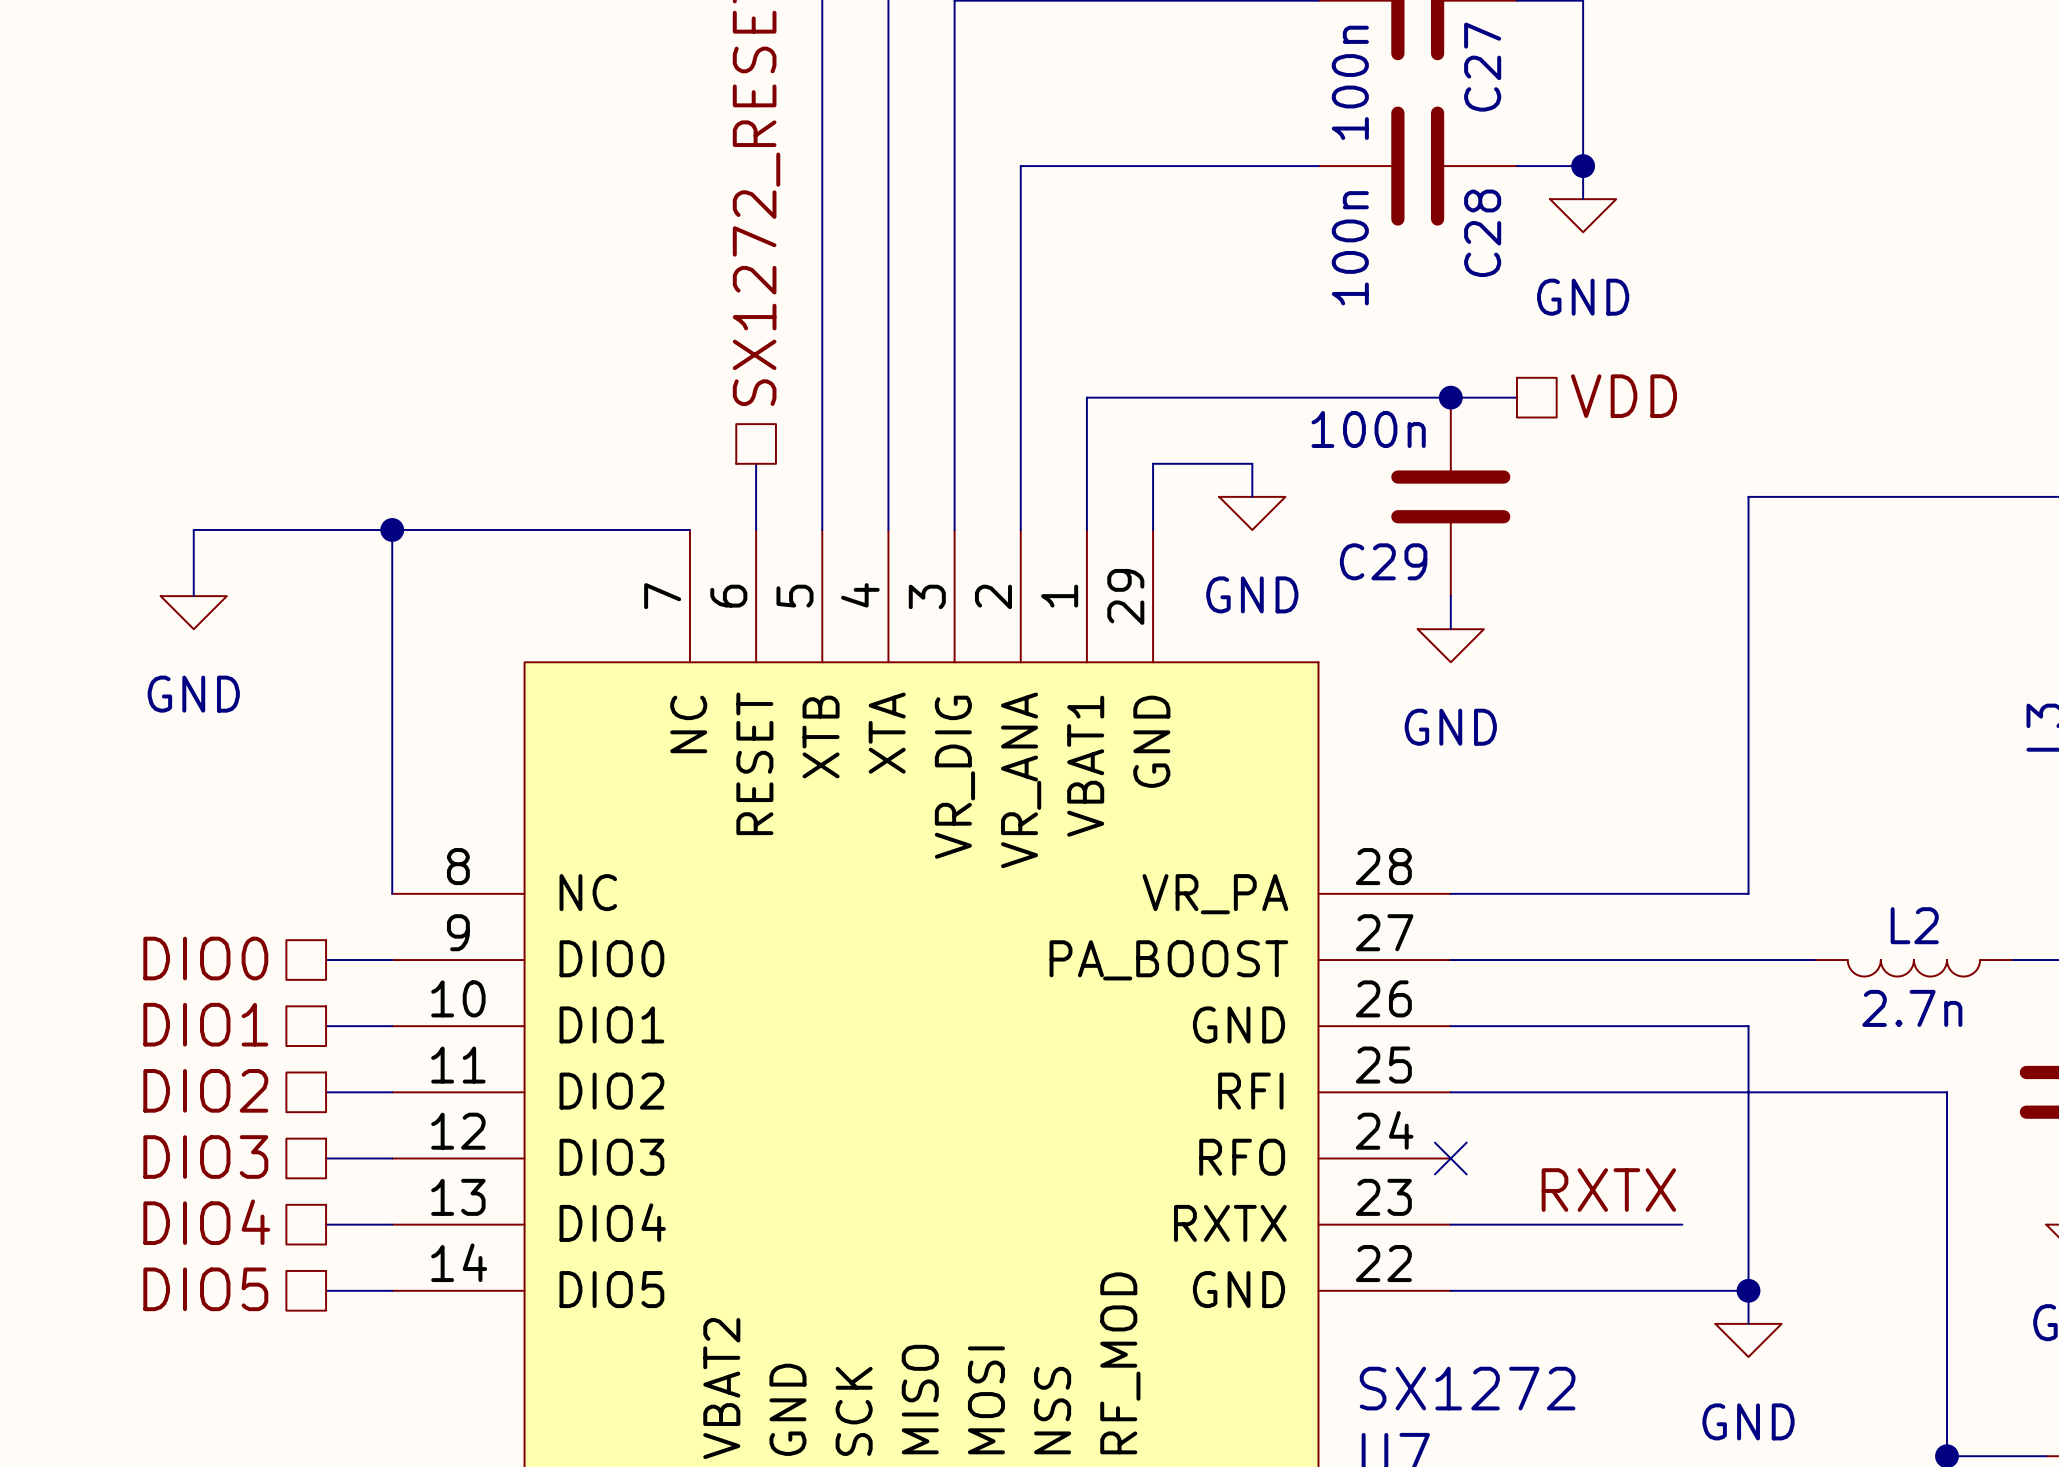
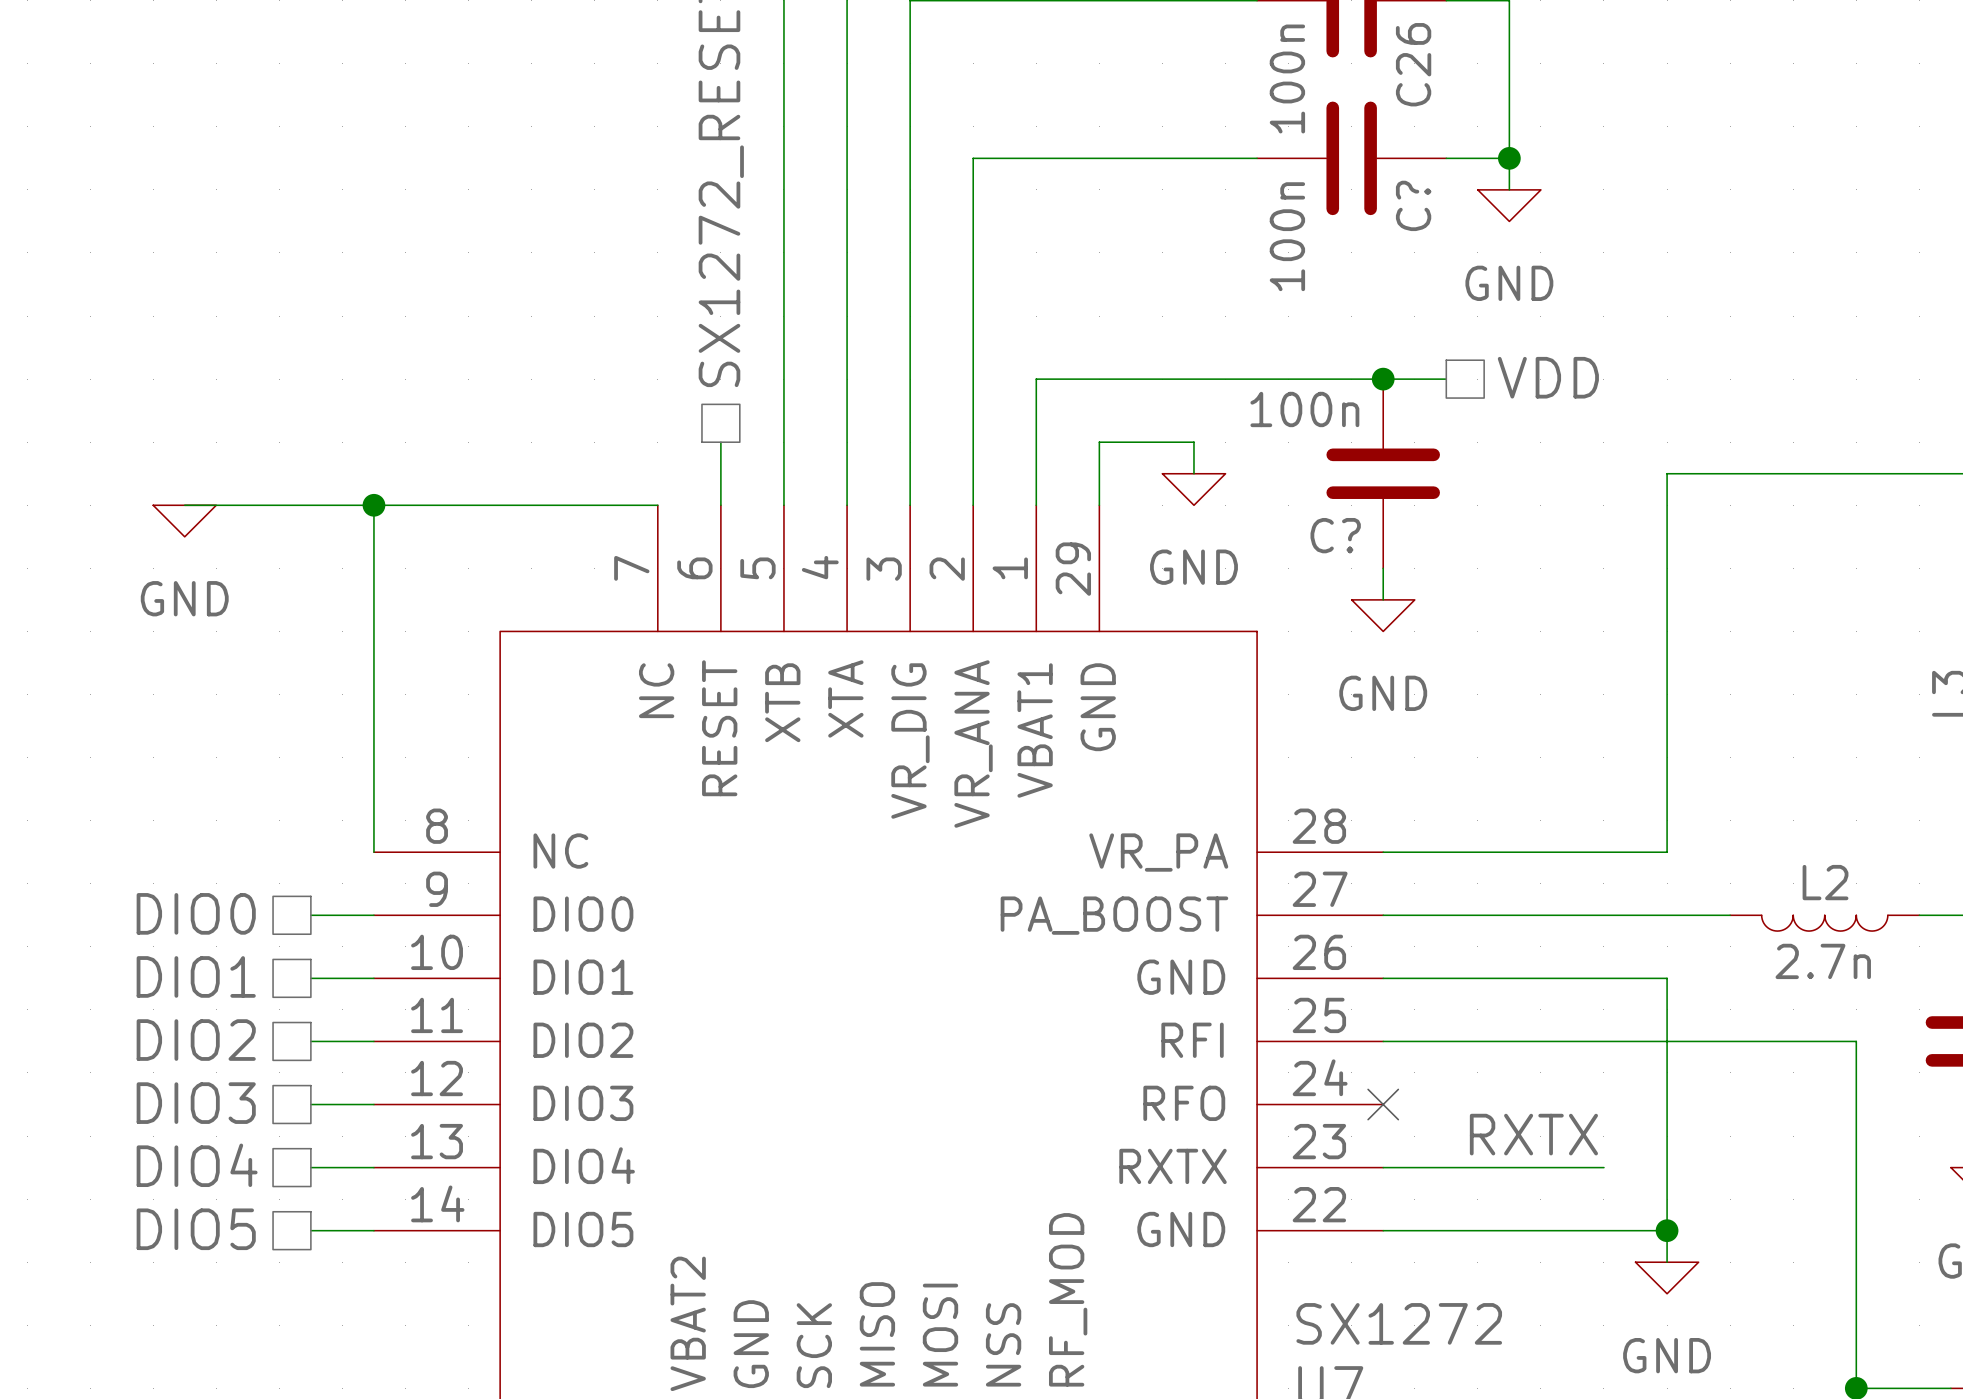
C27 name: C27 (1482, 67) -> C26 (1413, 64)
C28 name: C28 (1482, 233) -> C? (1413, 205)
wire: (193, 529) (193, 596) -> none
C29 name: C29 (1383, 561) -> C? (1335, 535)
power symbol position: GND (193, 612) -> GND (184, 521)

